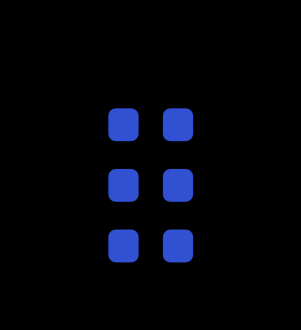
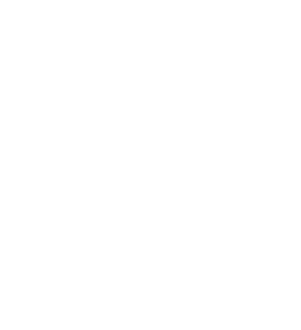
part: (150, 124) -> none
part: (150, 185) -> none
part: (150, 245) -> none

